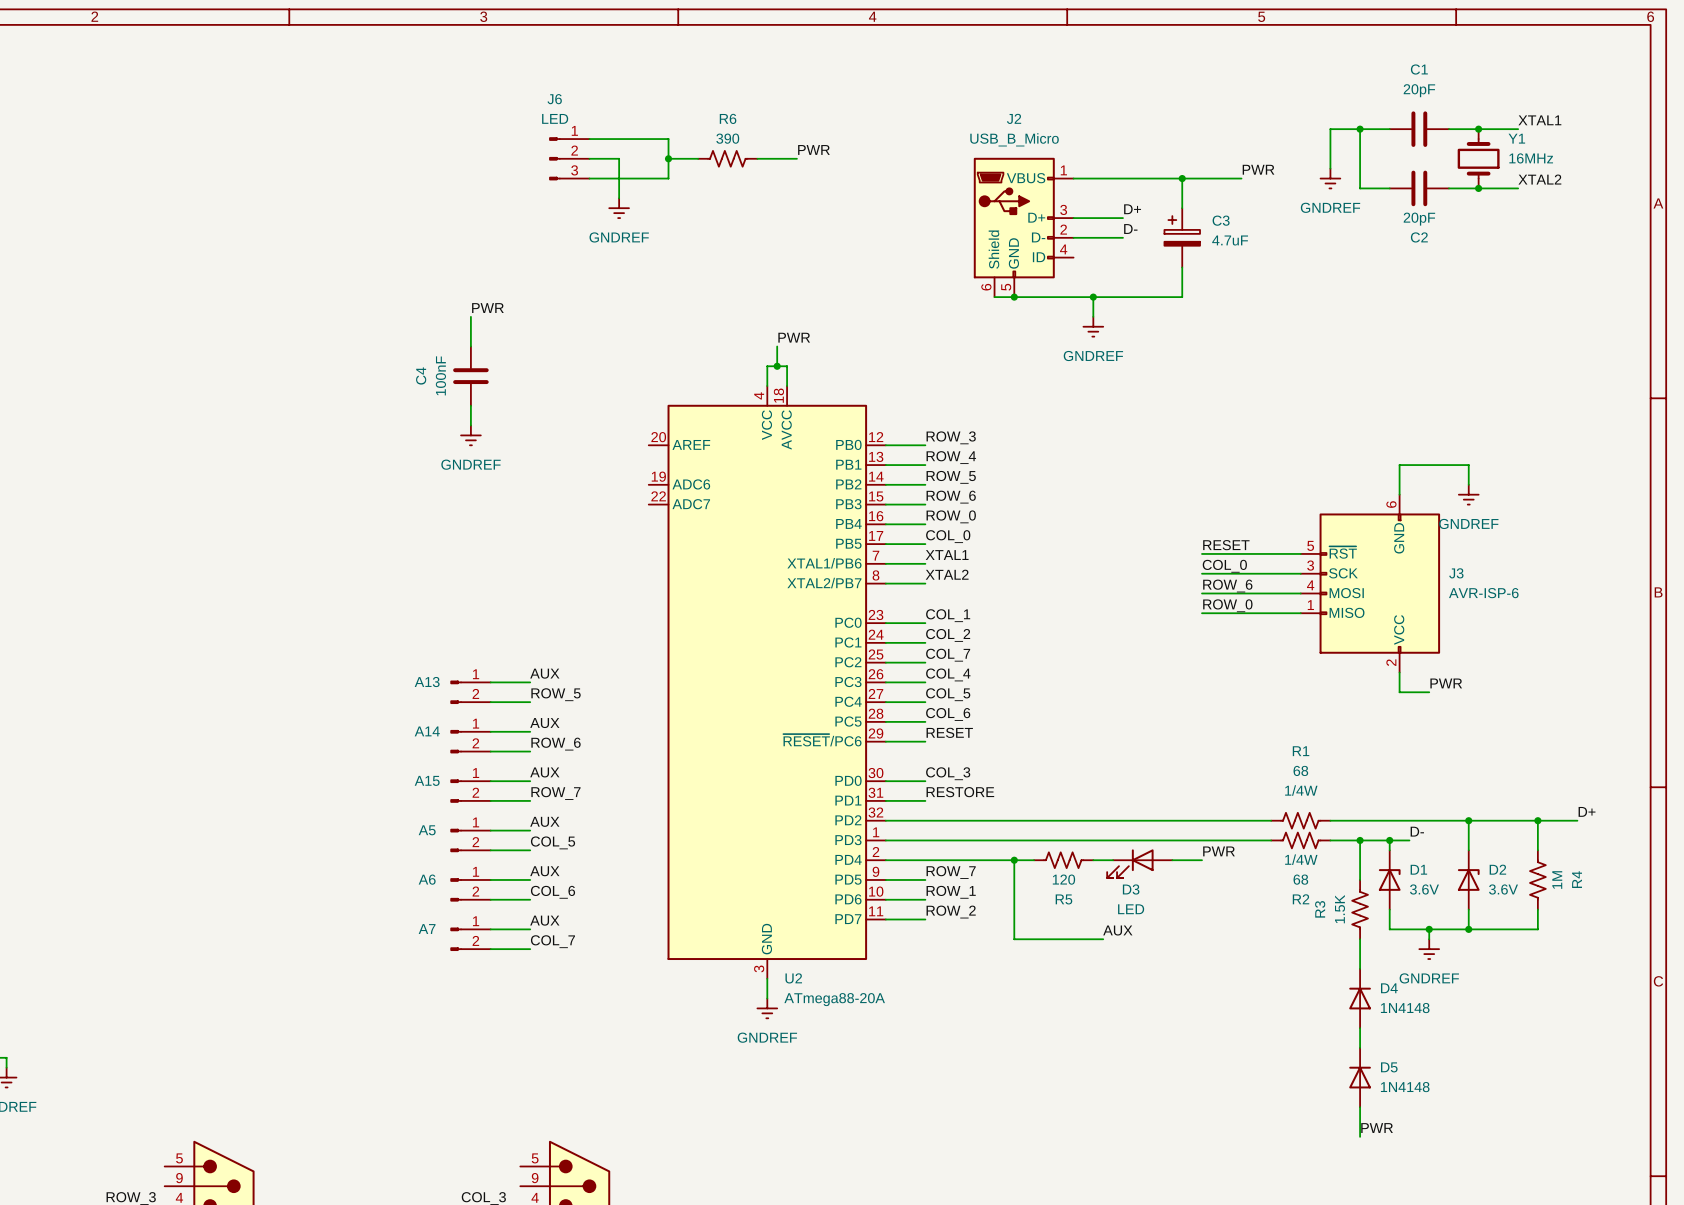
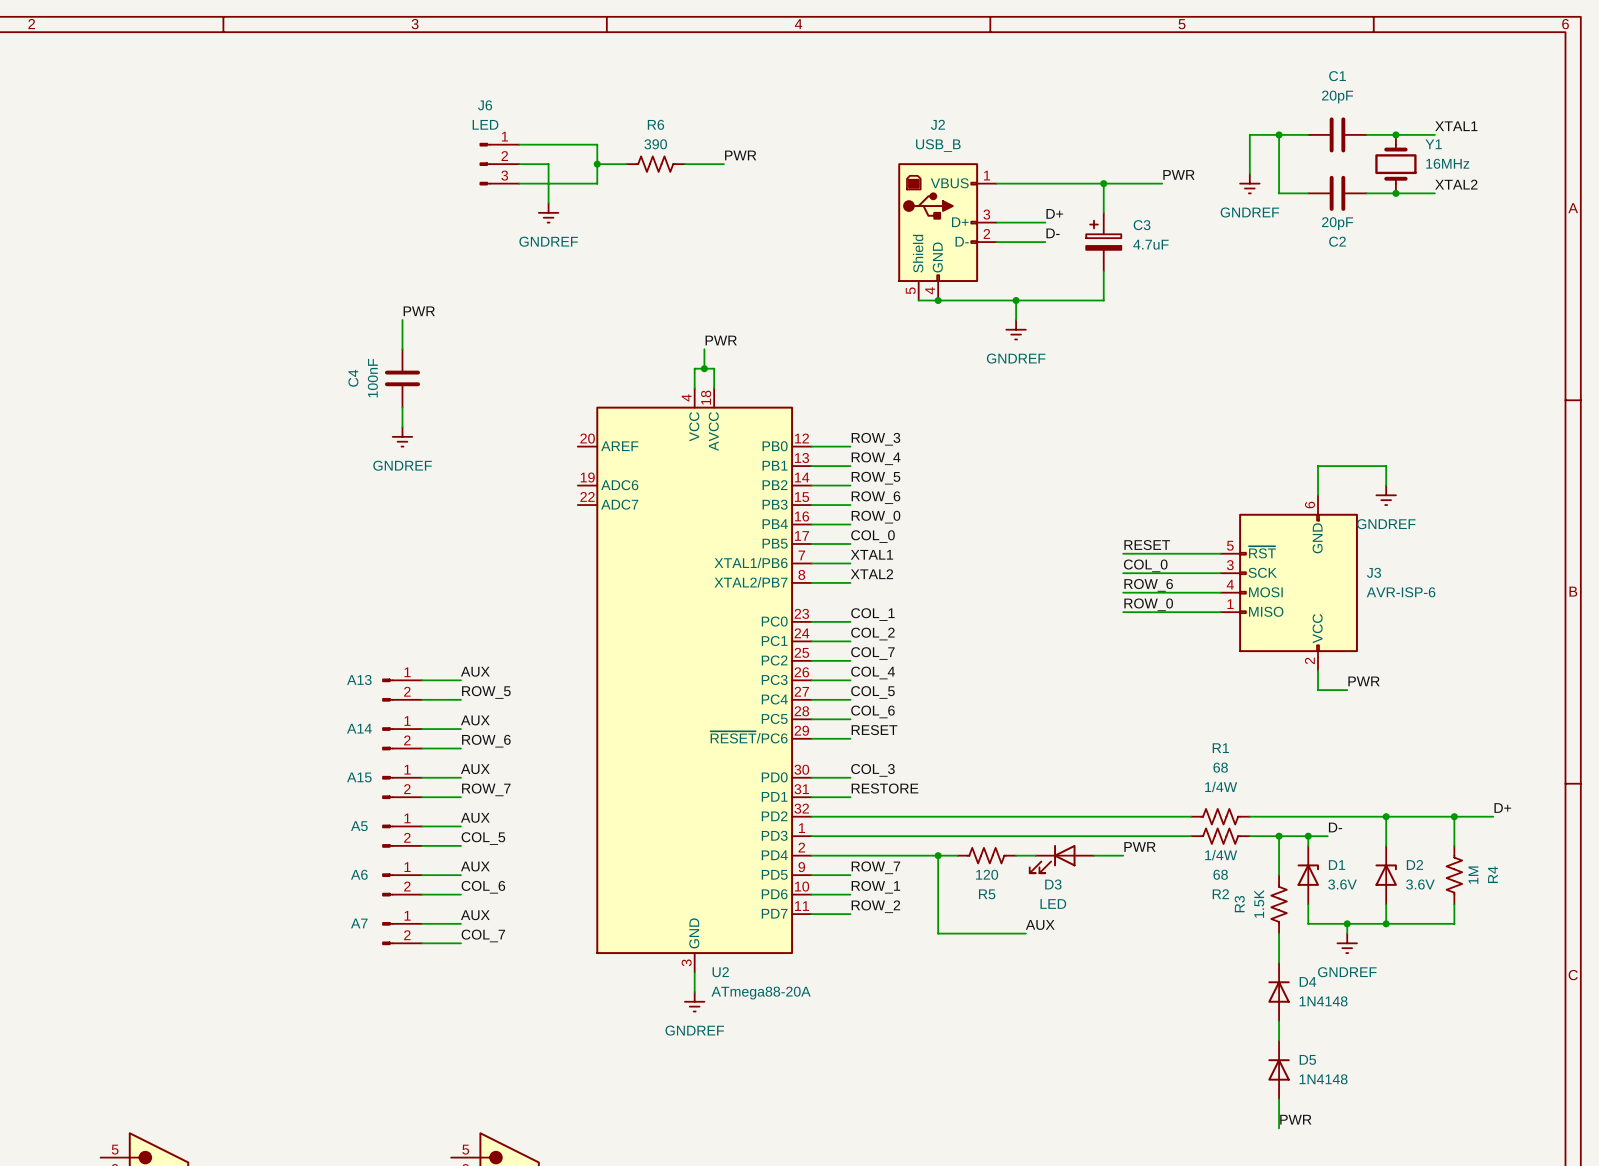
J2 value: USB_B_Micro (1014, 139) -> USB_B (938, 145)
J2 symbol: [973, 157, 1074, 298] -> [898, 163, 997, 301]

